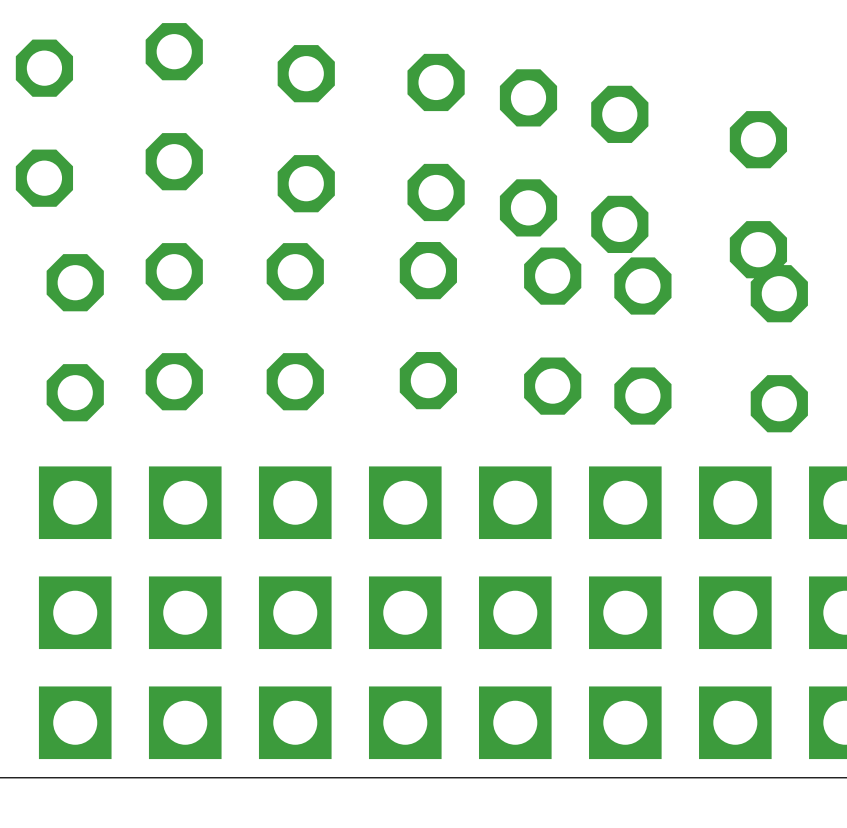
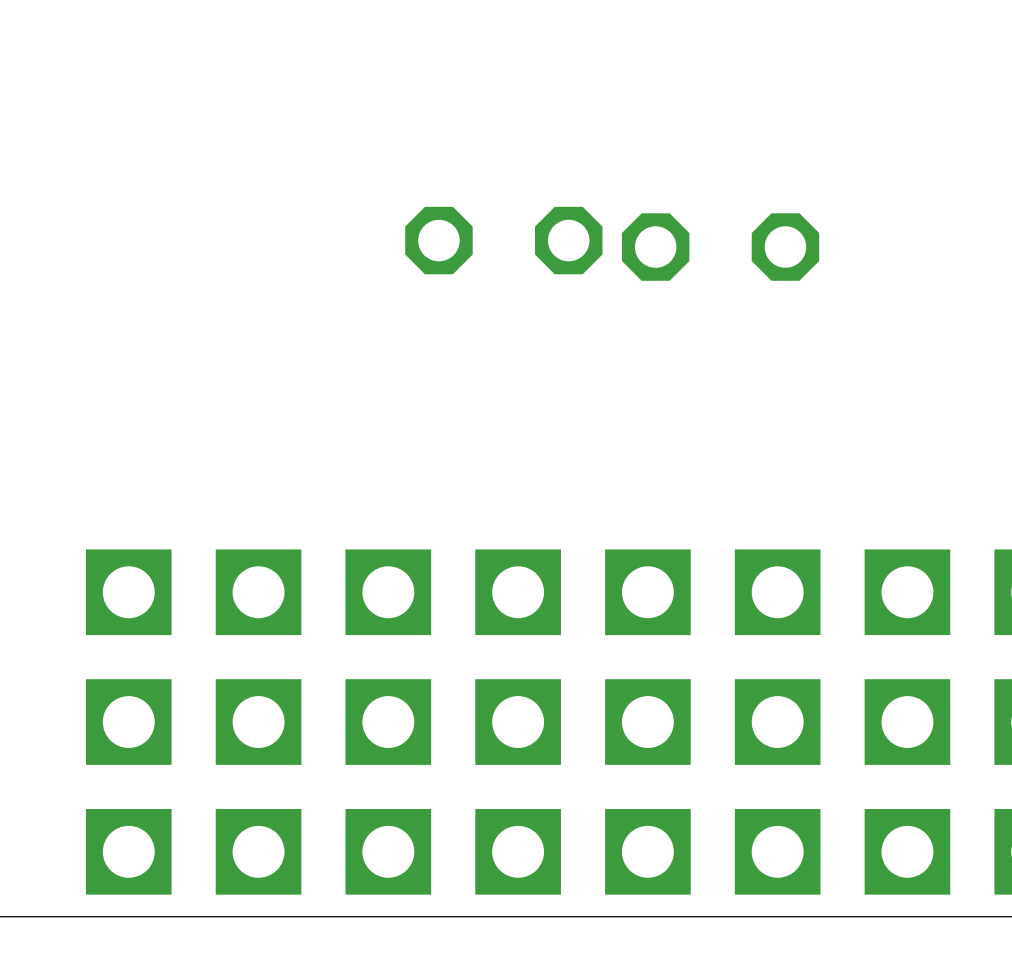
part: (174, 106) -> none
part: (44, 123) -> none
part: (306, 128) -> none
part: (436, 137) -> none
part: (528, 152) -> none
part: (619, 169) -> none
part: (758, 194) -> none
part: none -> (503, 240)
part: none -> (720, 247)
part: (428, 325) -> none
part: (174, 326) -> none
part: (295, 326) -> none
part: (552, 331) -> none
part: (75, 337) -> none
part: (642, 341) -> none
part: (779, 348) -> none

